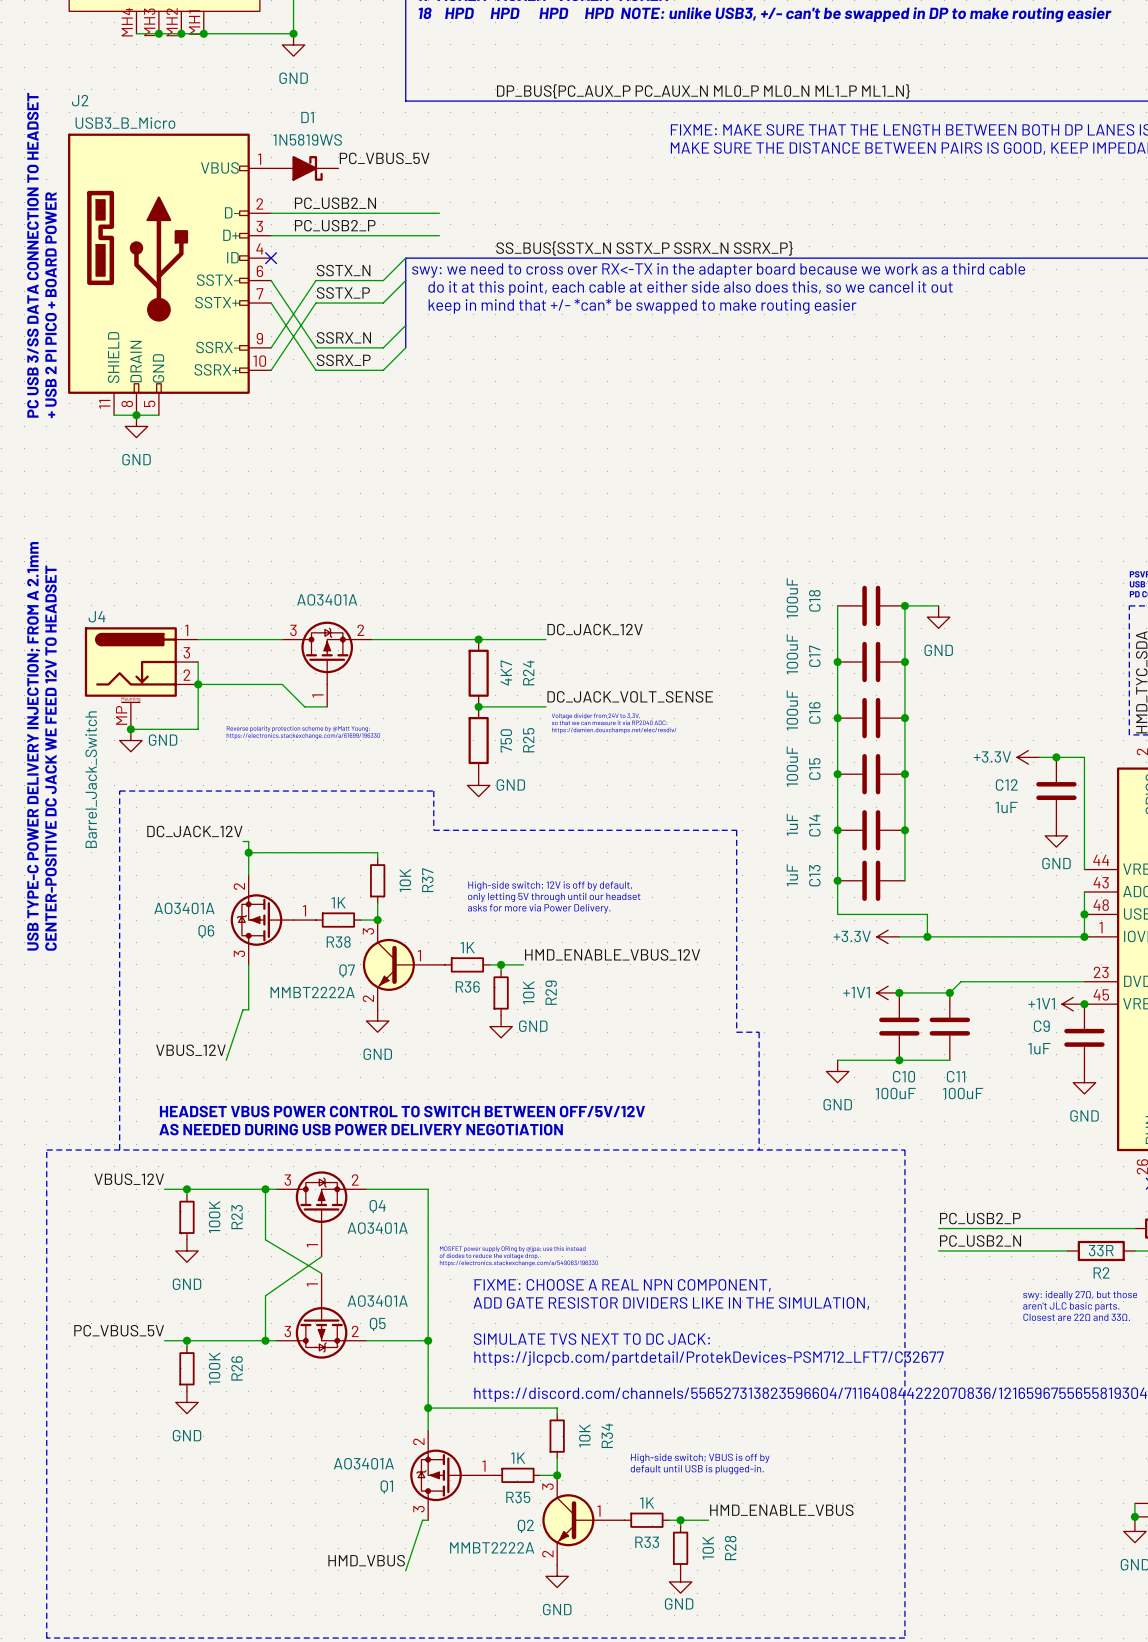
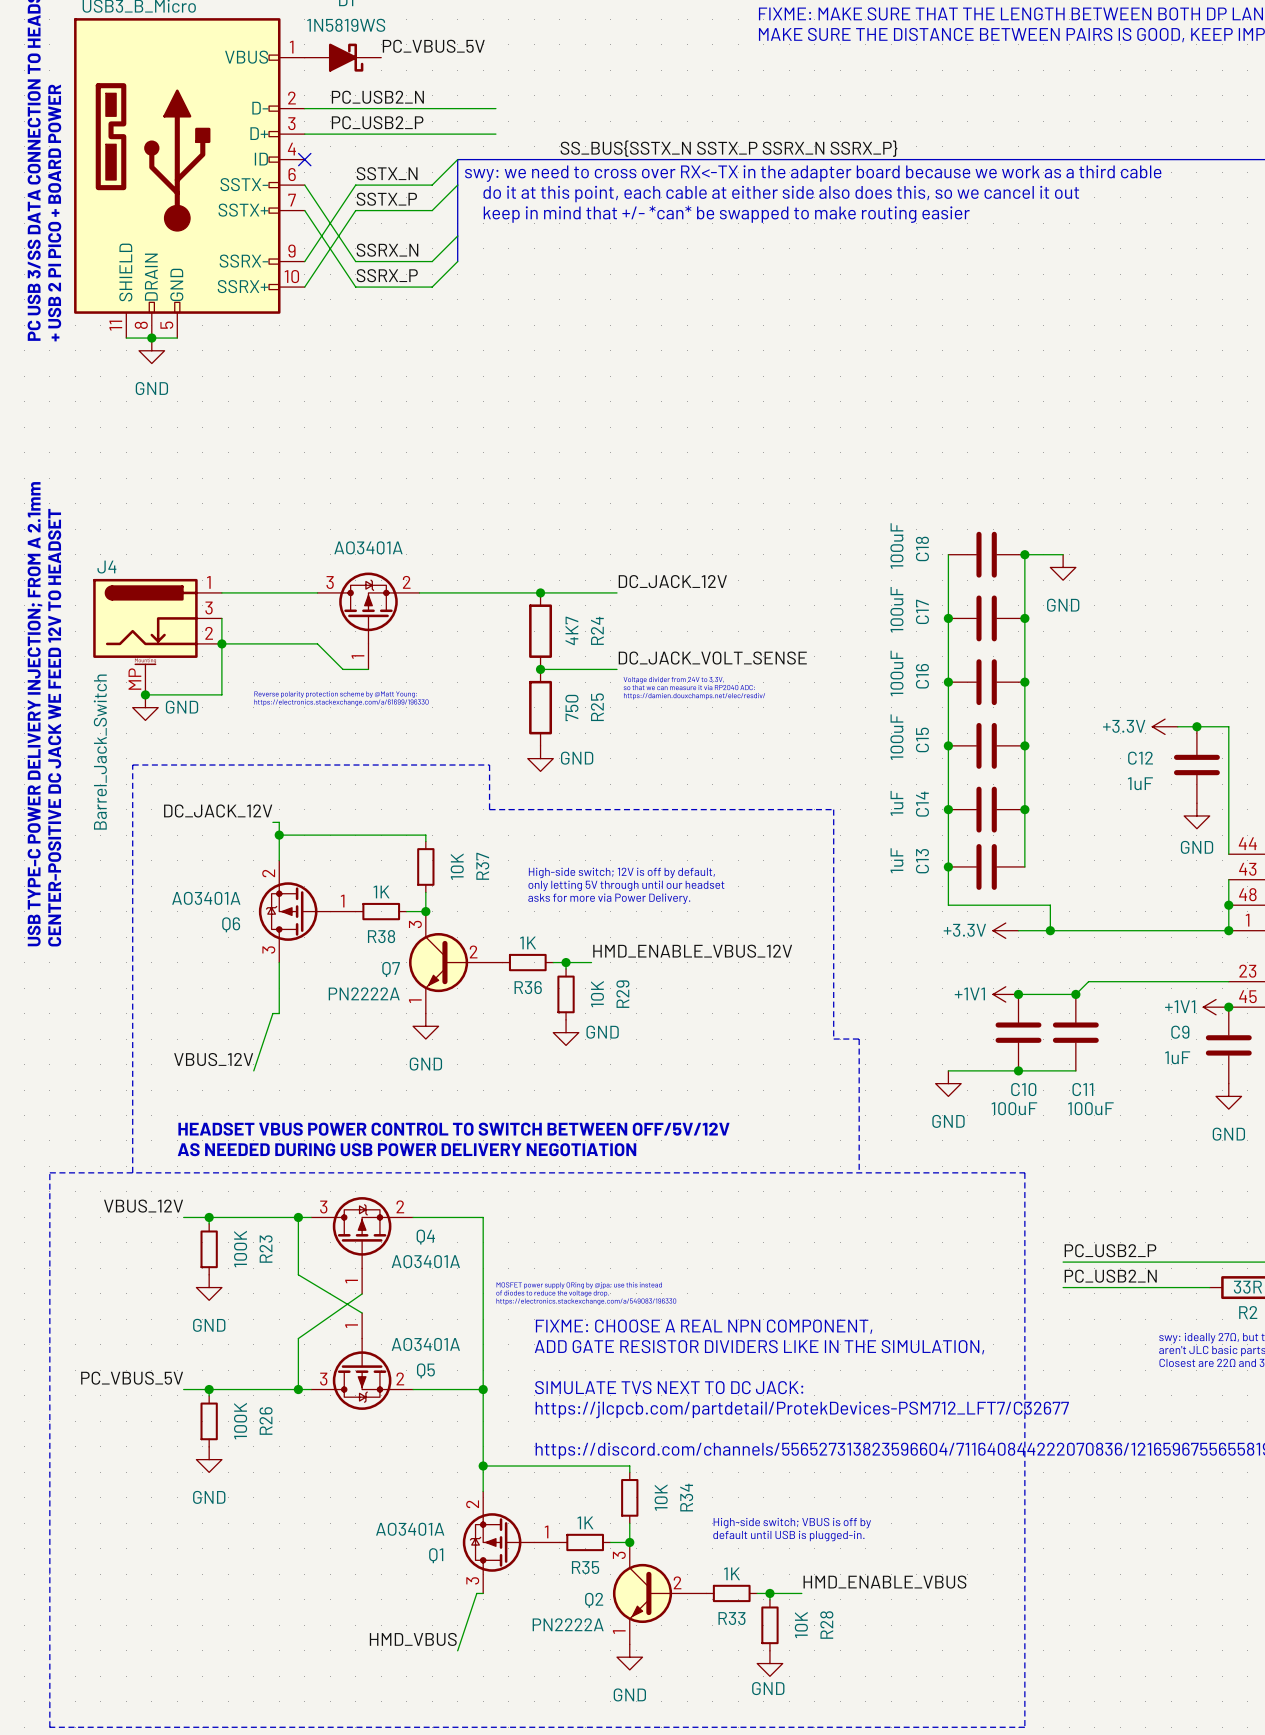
Q7 pin number: 1 (419, 955) -> 2 (473, 951)
Q7 value: MMBT2222A (312, 992) -> PN2222A (364, 993)
Q7 pin number: 2 (368, 998) -> 1 (415, 1001)
Q2 pin number: 1 (598, 1510) -> 2 (677, 1582)
Q2 value: MMBT2222A (492, 1547) -> PN2222A (568, 1624)
Q2 pin number: 2 (547, 1553) -> 1 (619, 1632)

